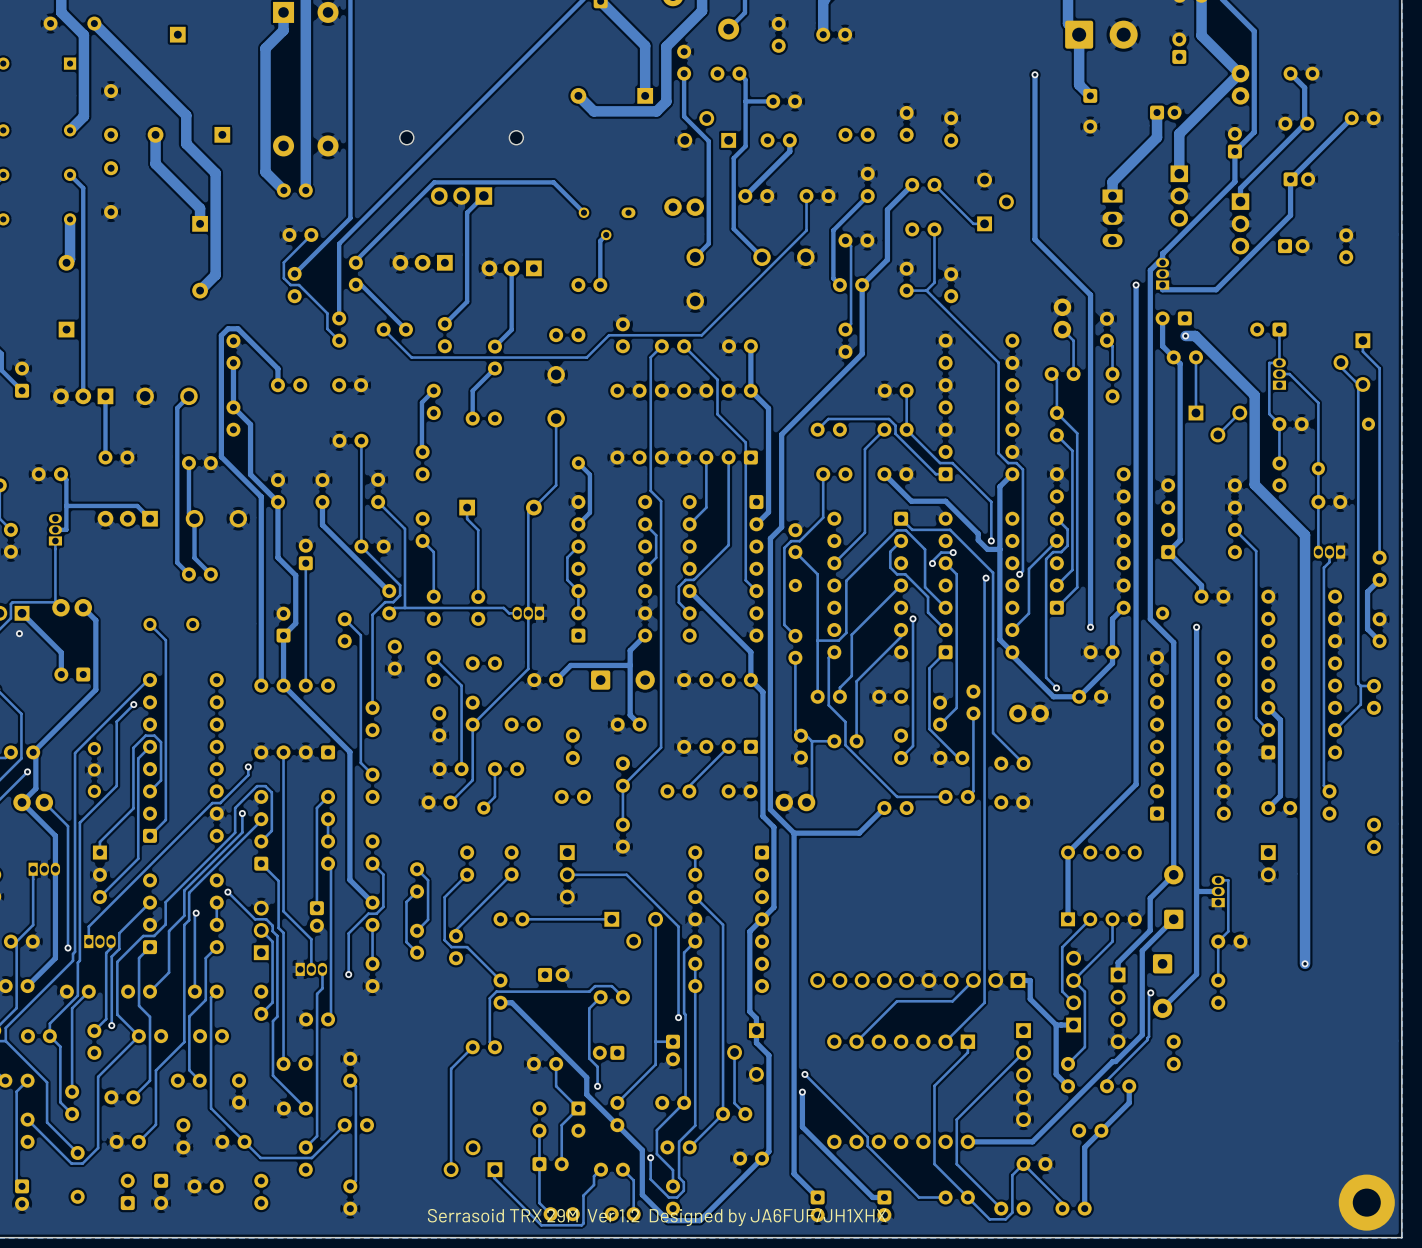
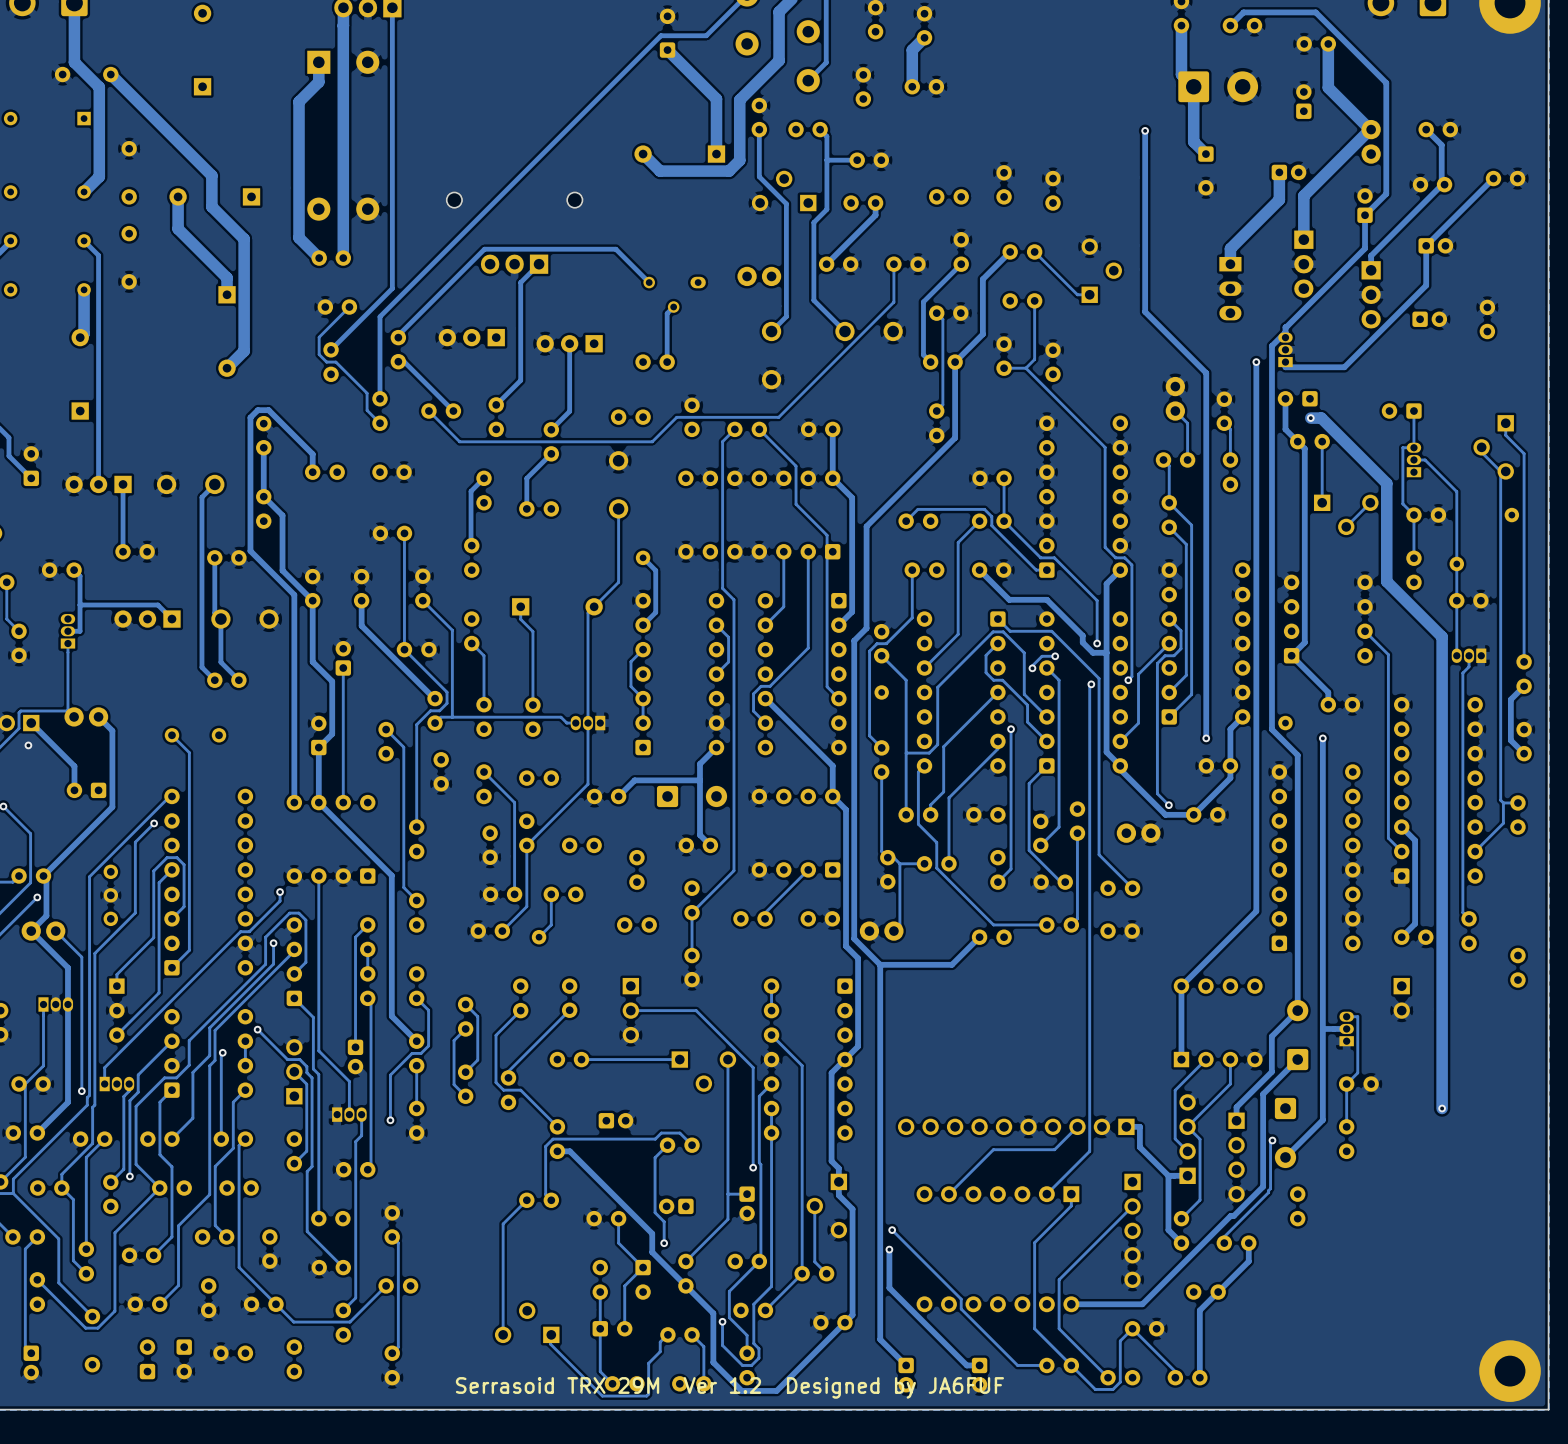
text: Serrasoid TRX 29M Ver 1.2 Designed by JA6FUF/JH1XHX (657, 1217) -> Serrasoid TRX 29M Ver 1.2 Designed by JA6FUF (729, 1387)

